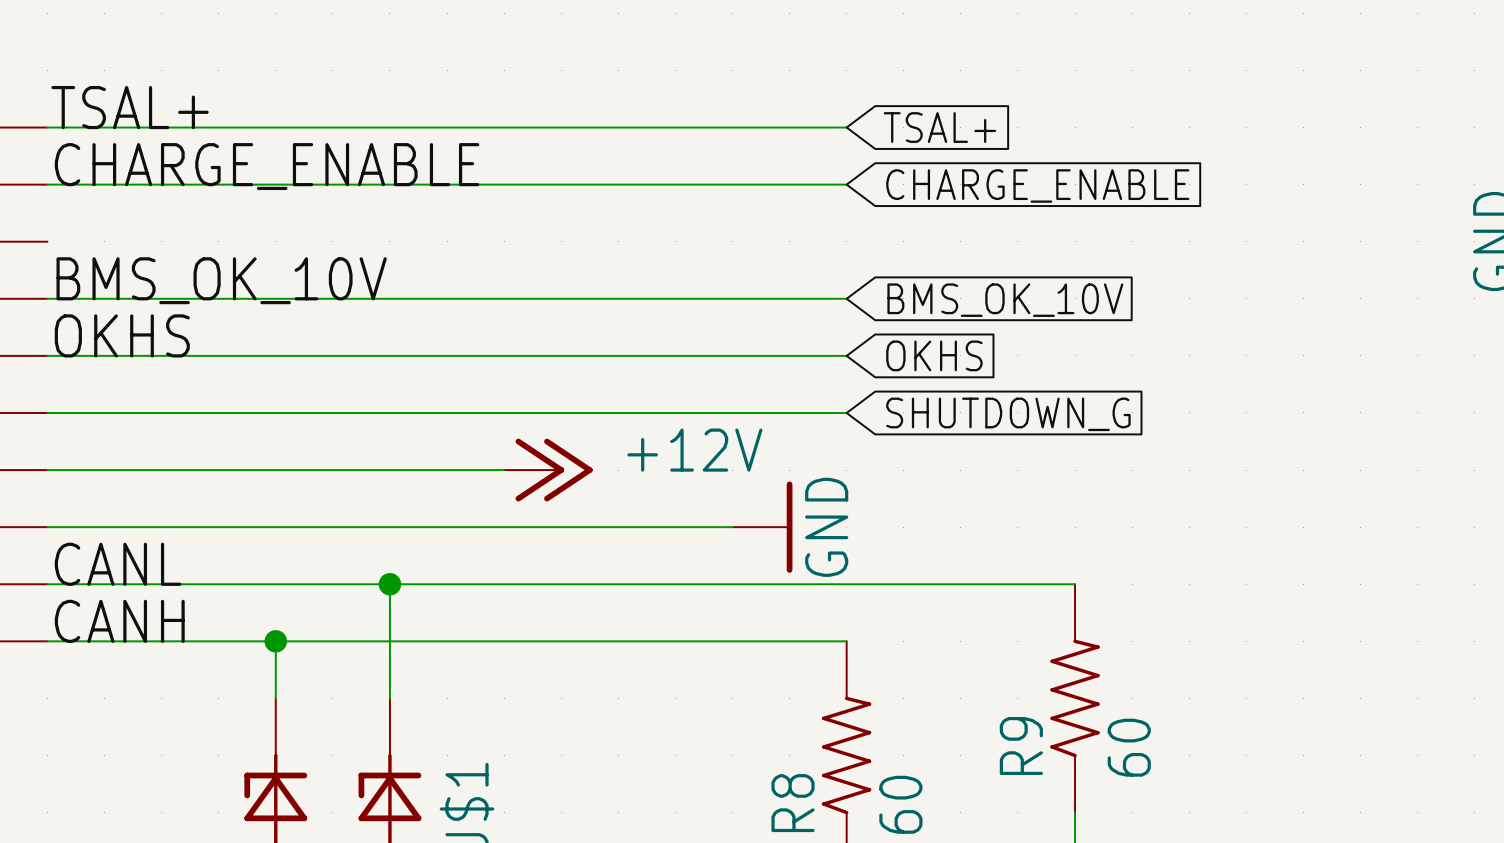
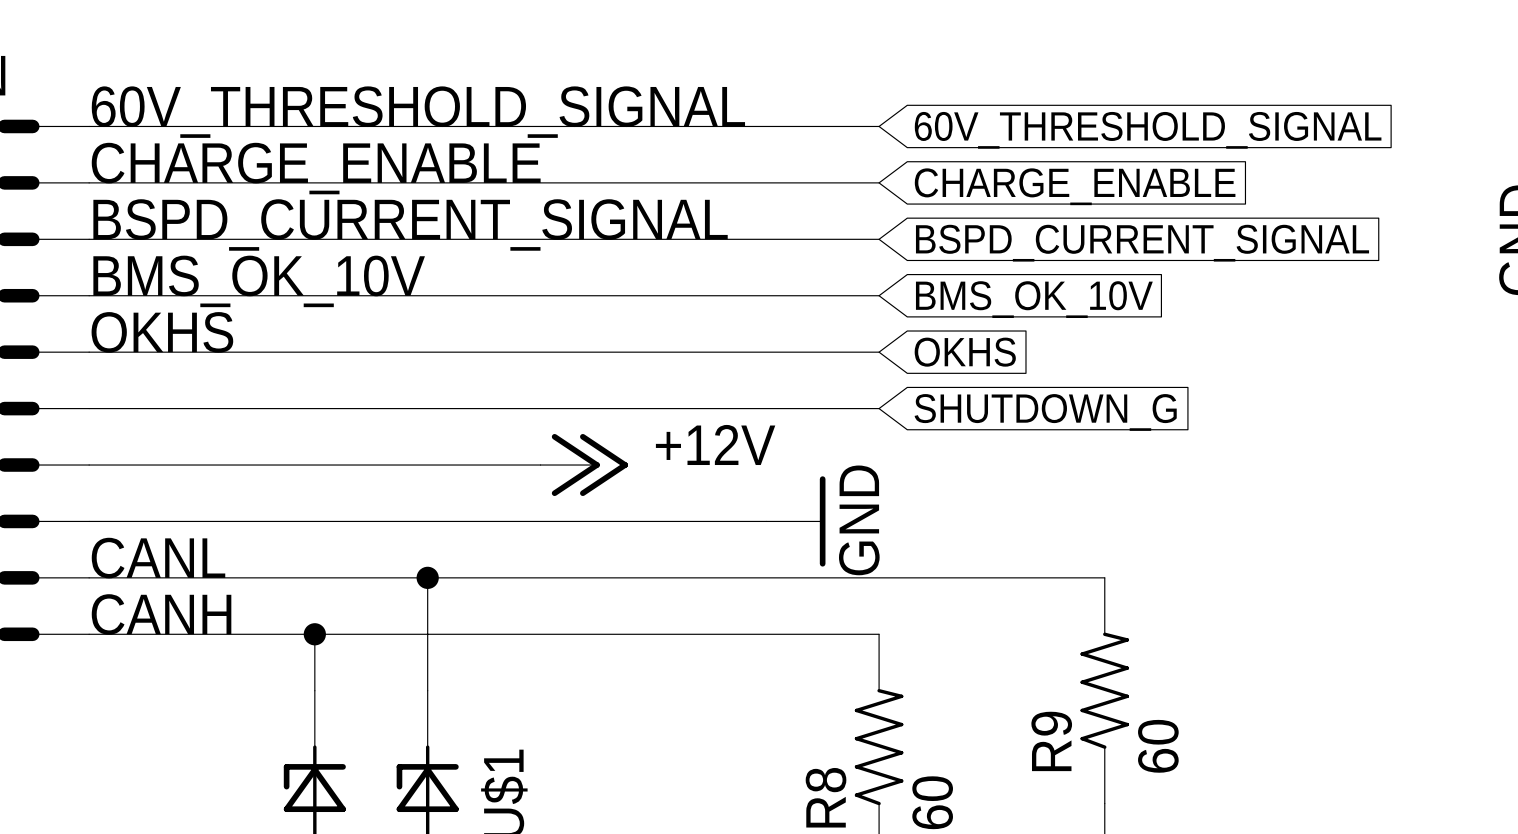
label: TSAL+ (130, 107) -> 60V_THRESHOLD_SIGNAL (418, 112)
global label: TSAL+ (939, 127) -> 60V_THRESHOLD_SIGNAL (1148, 130)
label: none -> BSPD_CURRENT_SIGNAL (410, 224)
wire: none -> (89, 239) (879, 239)
global label: none -> BSPD_CURRENT_SIGNAL (1142, 243)

